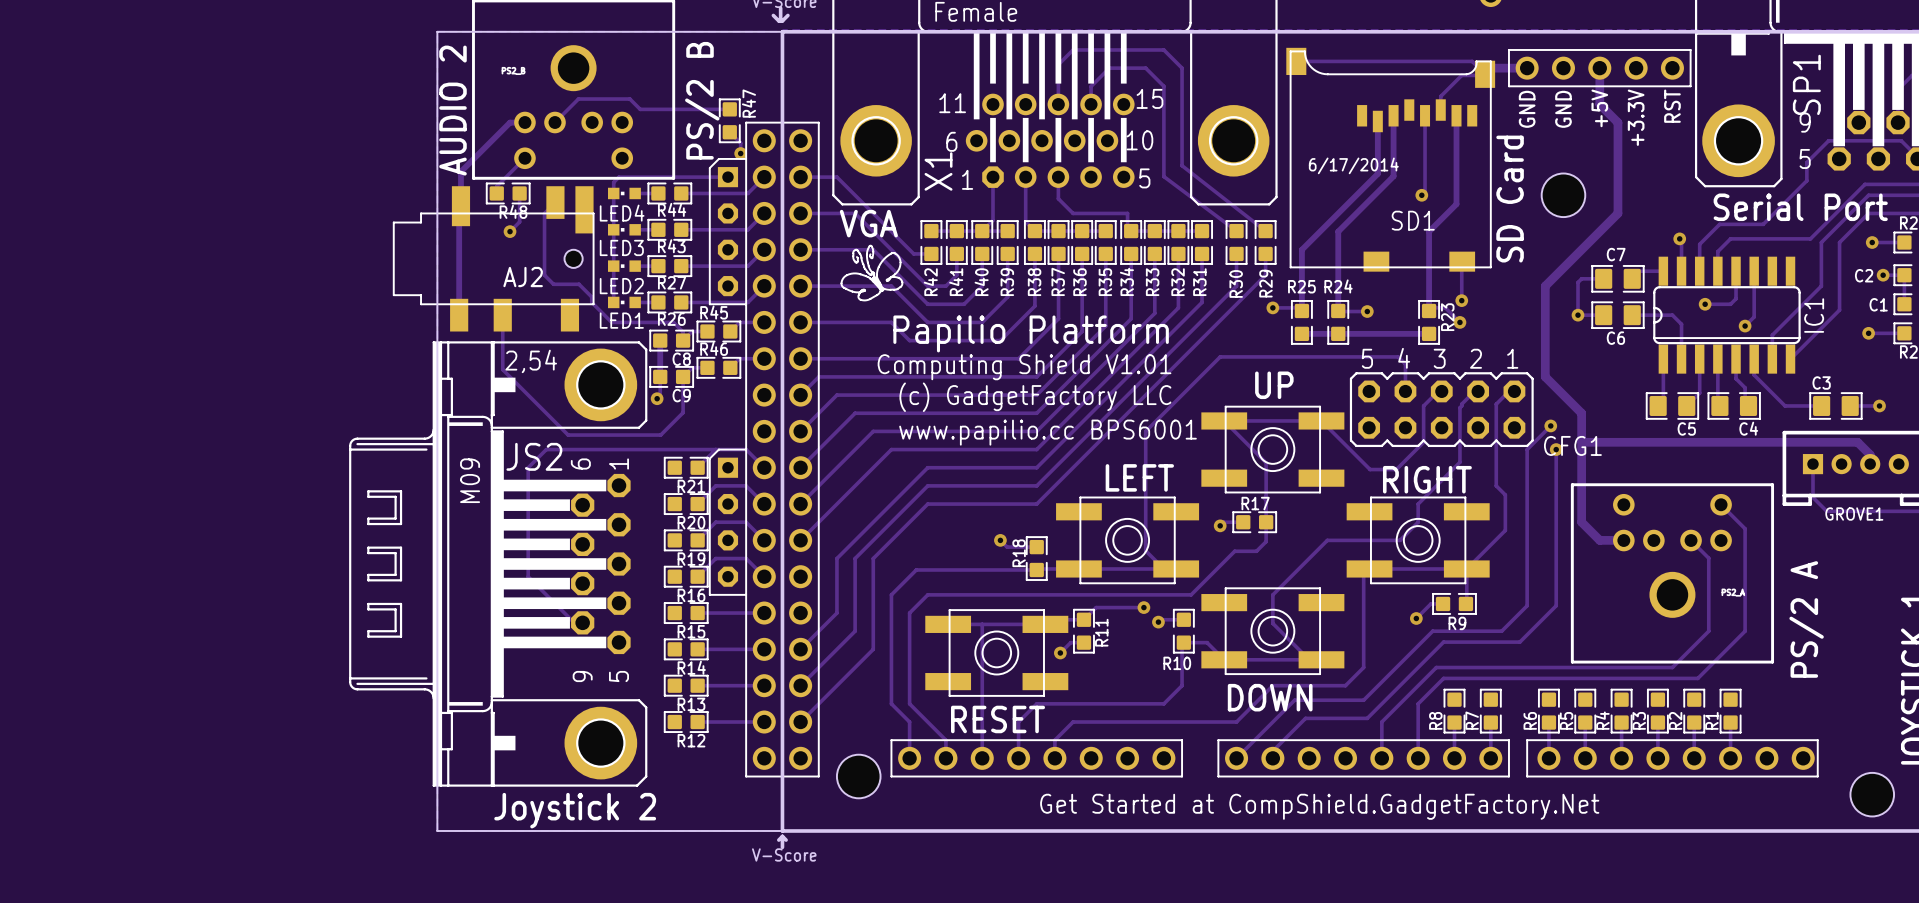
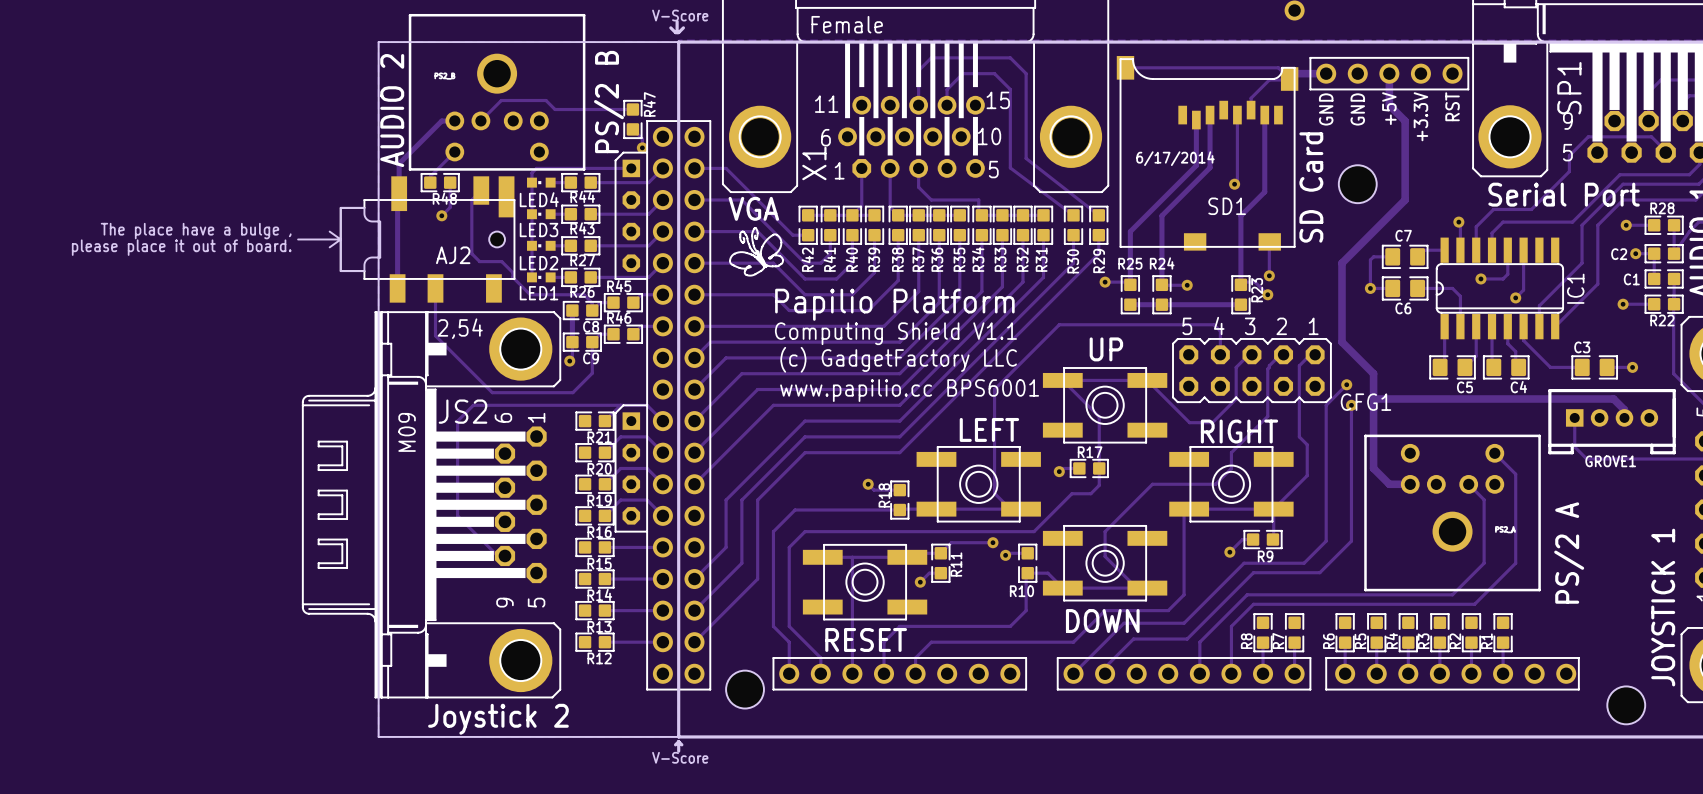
AJ2 footprint: [392, 186, 595, 332] -> [297, 176, 516, 303]
text: Computing Shield V1.01 (1024, 367) -> Computing Shield V1.1 (895, 333)
text: Get Started at CompShield.GadgetFactory.Net (1319, 806) -> none

